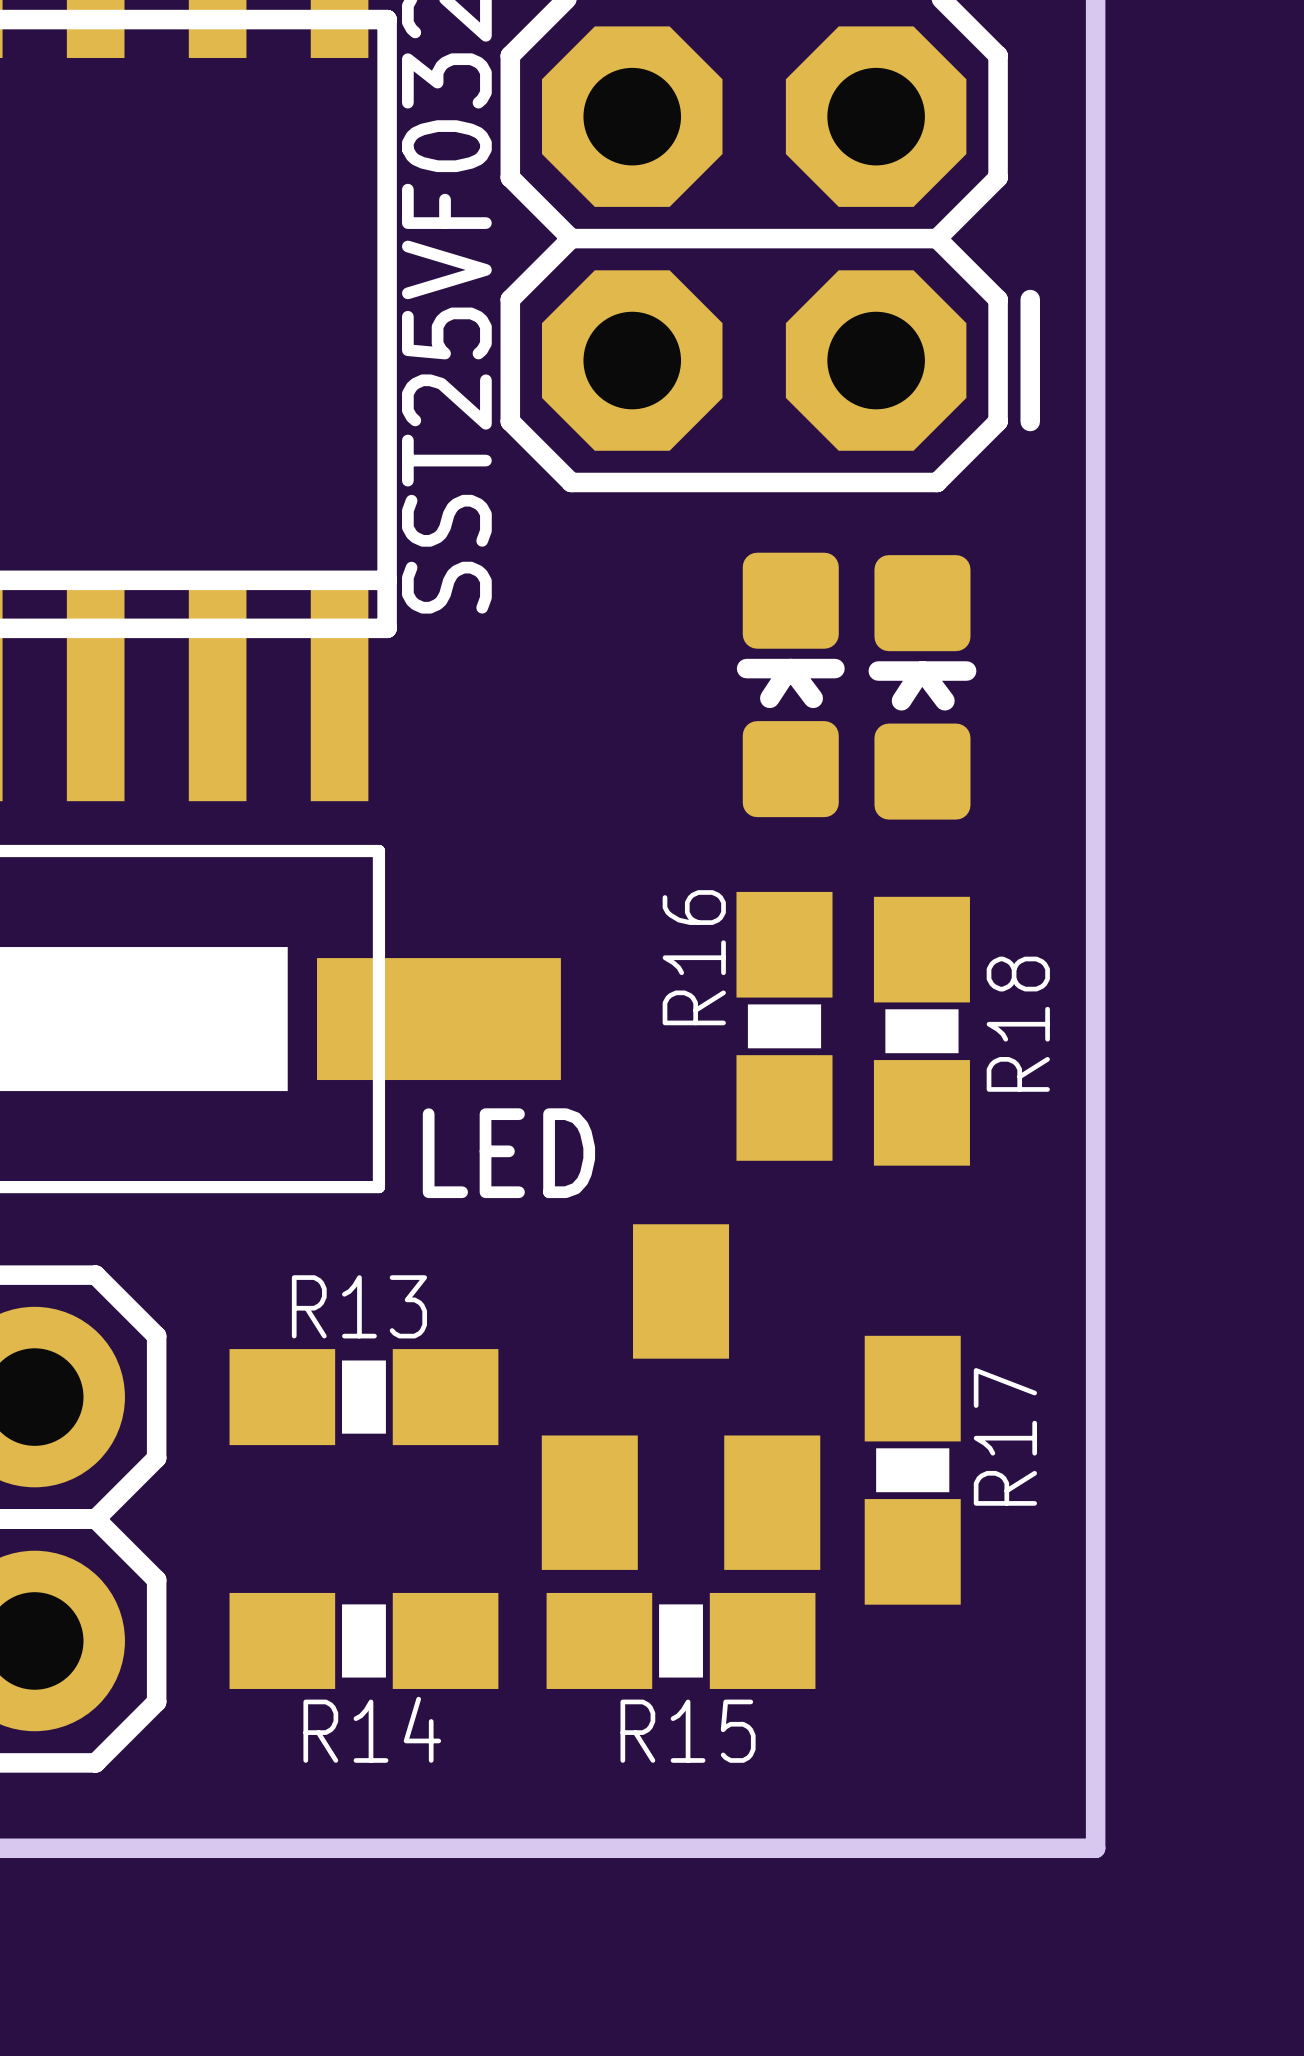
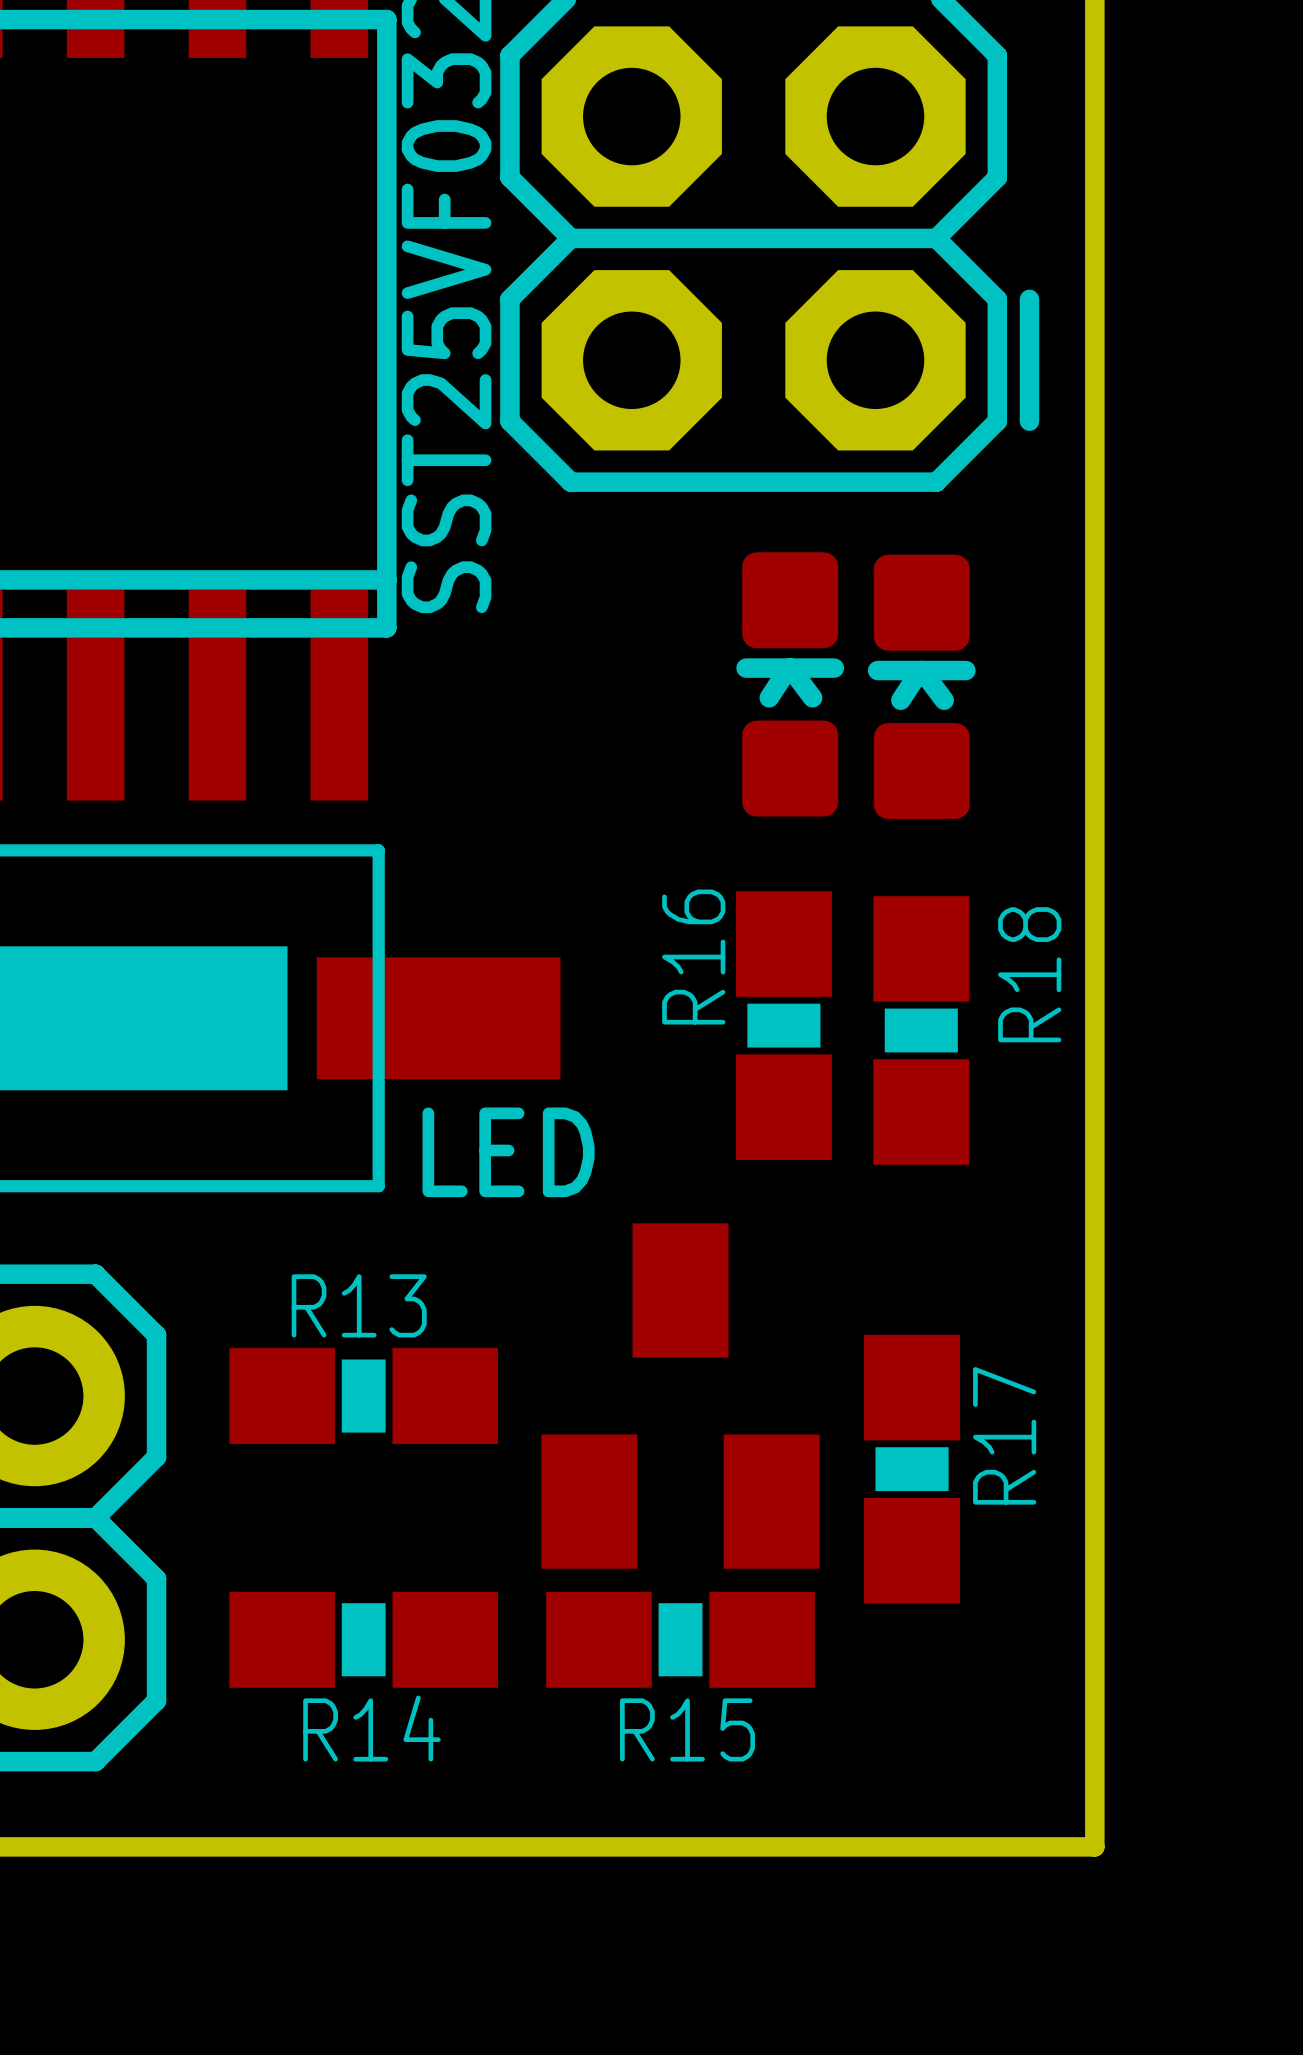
R18 name position: R18 (1018, 1024) -> R18 (1029, 974)

